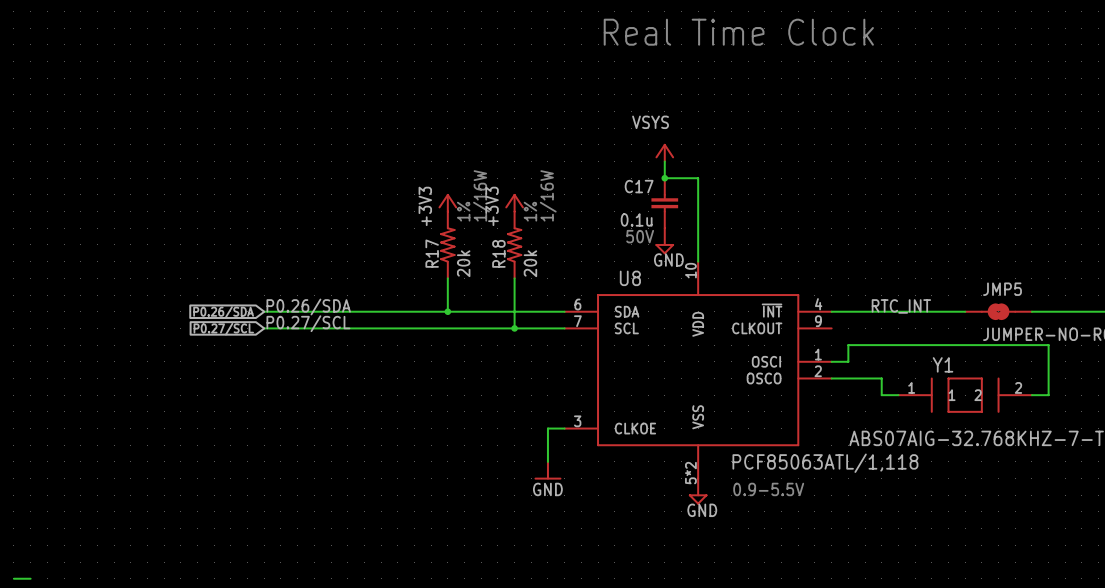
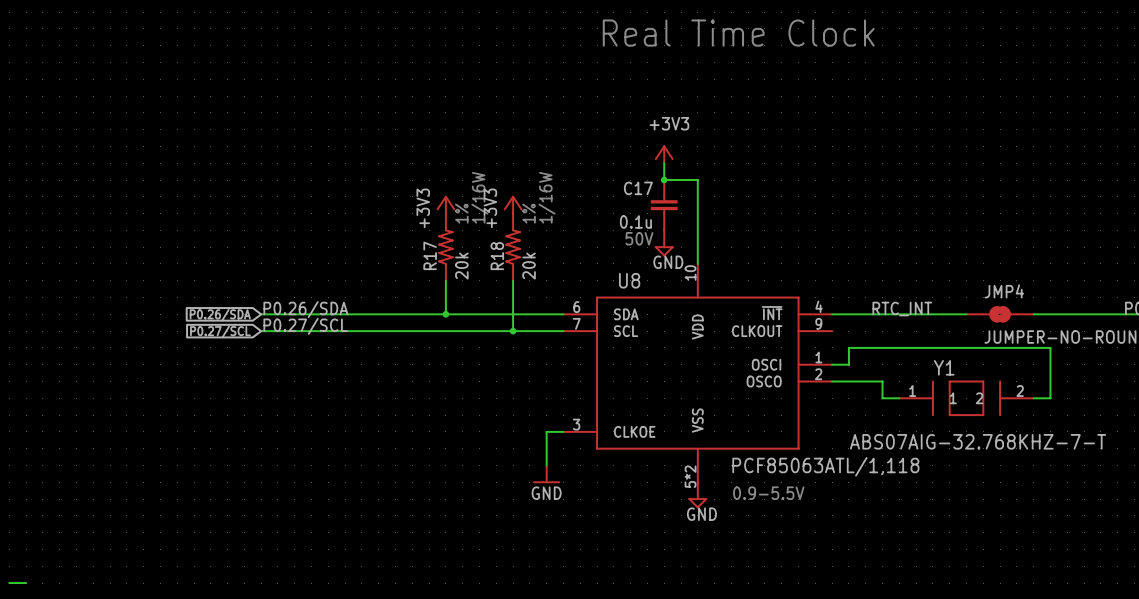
power symbol: VSYS (664, 152) -> +3V3 (664, 154)
JMP5 name: JMP5 (1002, 289) -> JMP4 (1004, 291)

